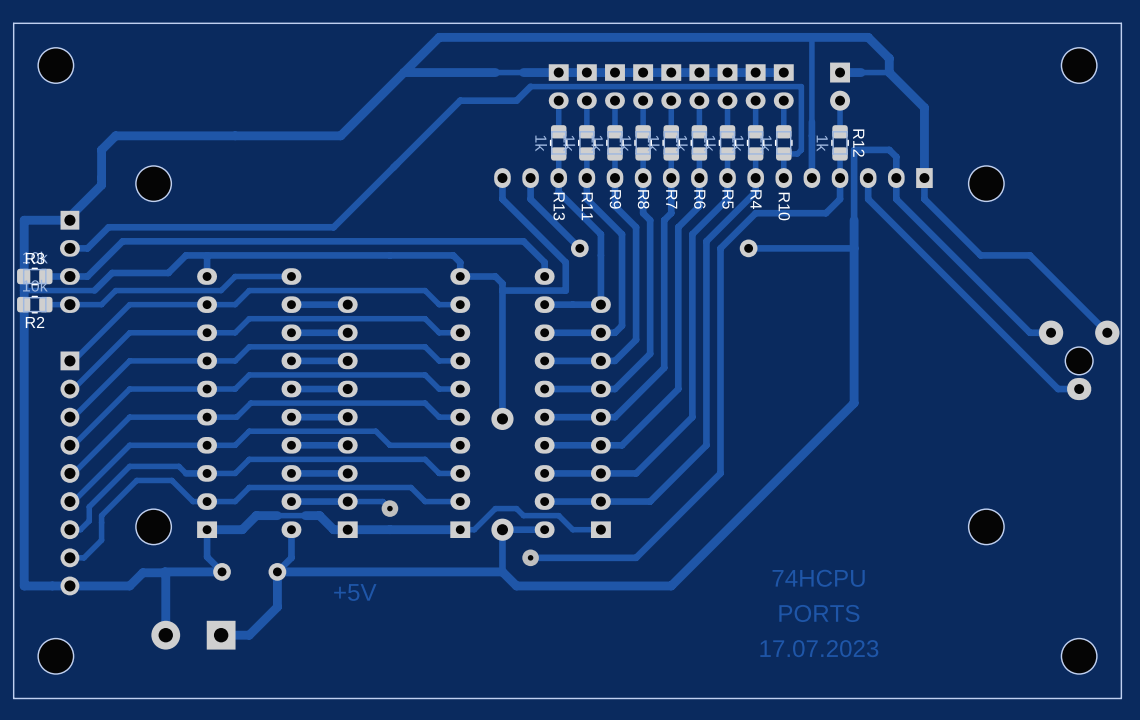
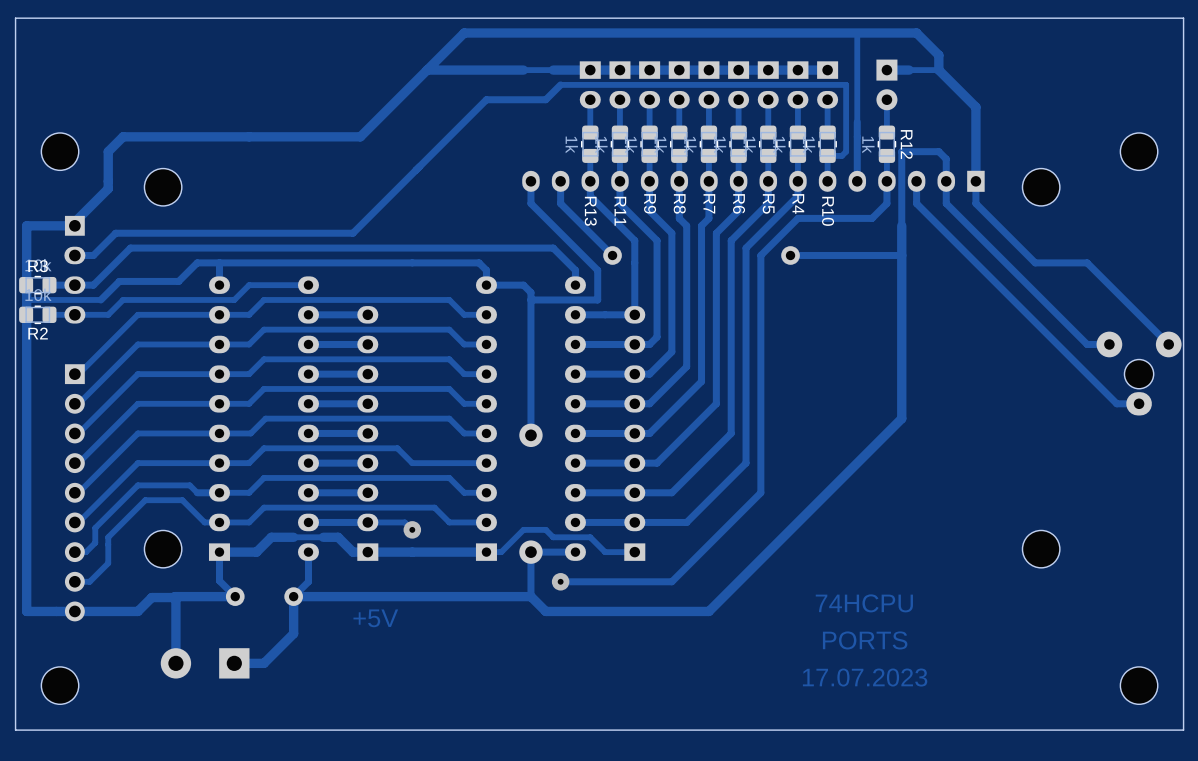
part position: (55, 65) -> (60, 151)
part position: (1079, 65) -> (1139, 151)

